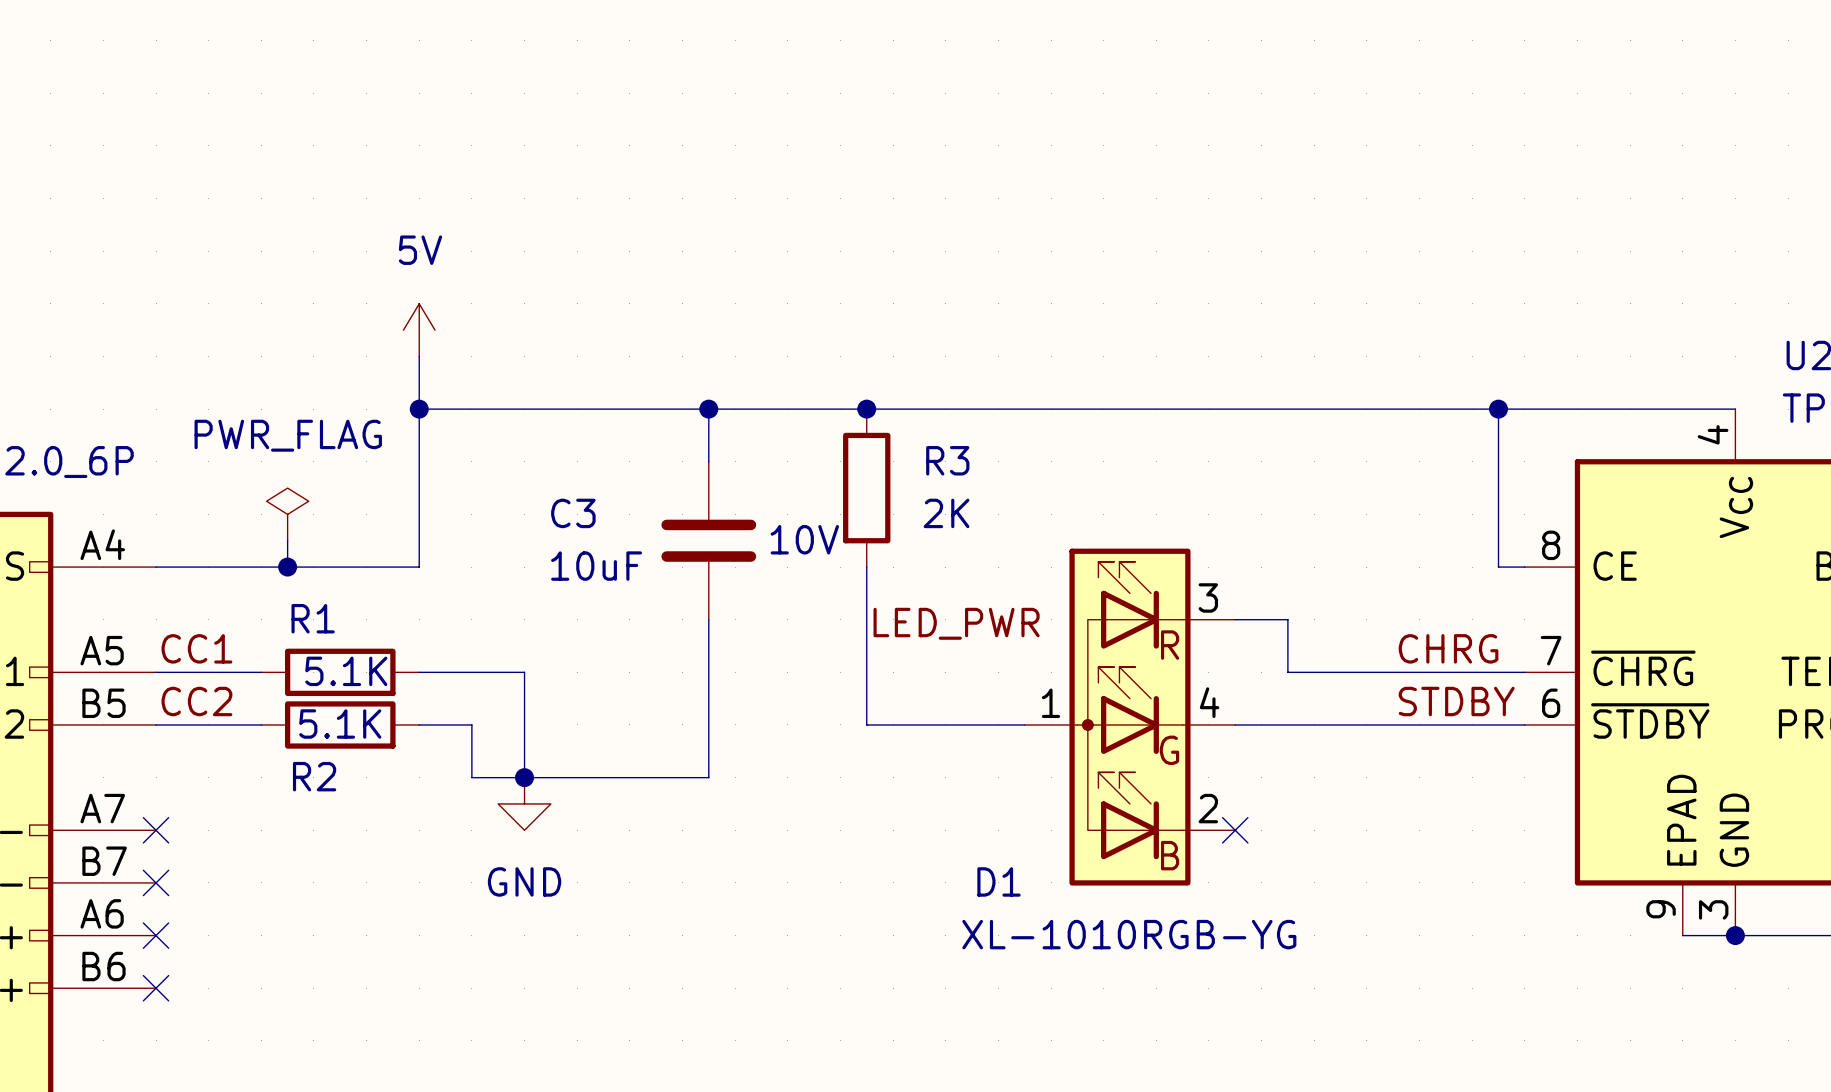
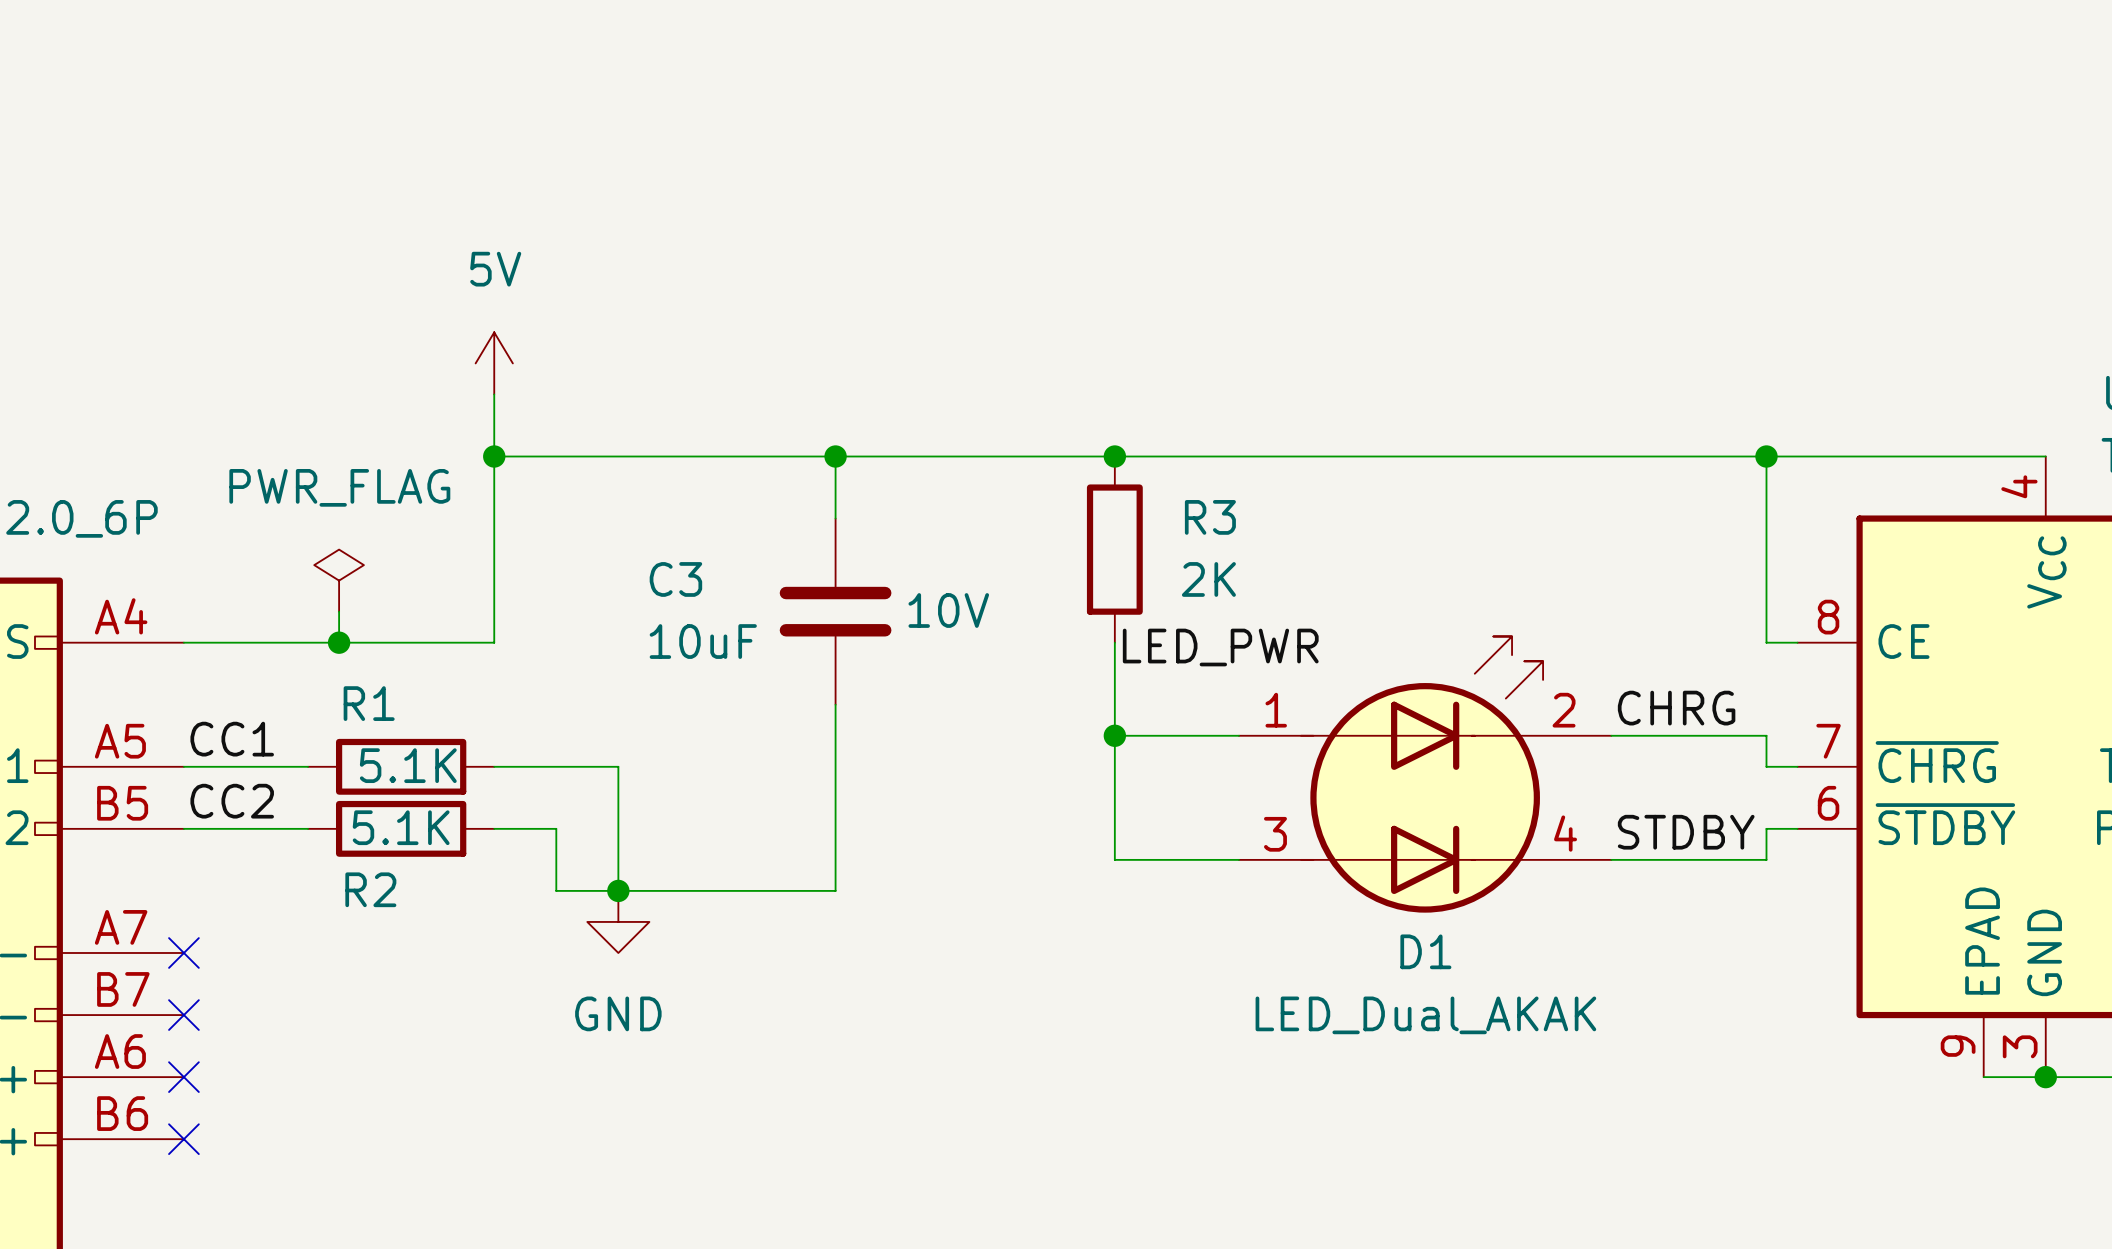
junction position: (866, 409) -> (1114, 456)
R3 position: (866, 488) -> (1114, 549)
D1 symbol: [1024, 548, 1236, 886] -> [1238, 636, 1612, 913]
wire: (866, 567) (866, 724) (1024, 724) -> none
wire: none -> (1114, 642) (1114, 859) (1238, 859)
wire: (1235, 619) (1287, 619) (1287, 672) (1498, 672) -> (1611, 735) (1766, 735) (1766, 766)
label position: LED_PWR (956, 623) -> LED_PWR (1220, 647)
wire: none -> (1114, 735) (1238, 735)
junction: none -> (1114, 735)
label position: CHRG (1448, 648) -> CHRG (1676, 708)
label position: STDBY (1456, 701) -> STDBY (1686, 832)
wire: (1235, 724) (1498, 724) -> (1611, 859) (1766, 859) (1766, 828)
no-connect mark: (1235, 830) -> none
D1 name position: D1 (998, 881) -> D1 (1425, 951)
D1 value: XL-1010RGB-YG (1129, 934) -> LED_Dual_AKAK (1425, 1015)

